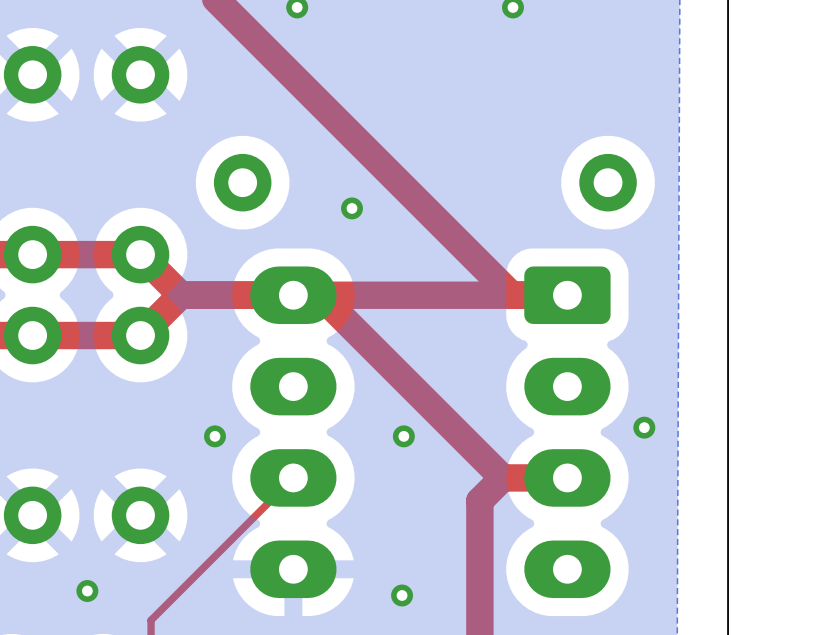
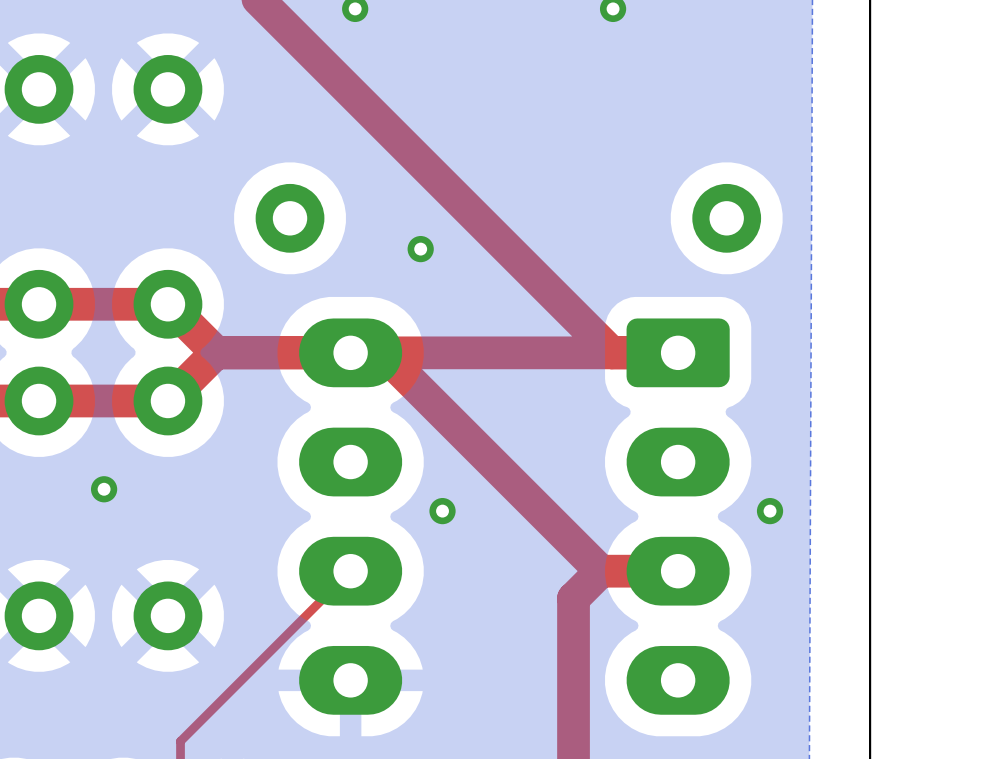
via: none -> (104, 489)
via: (214, 436) -> none
via position: (403, 436) -> (442, 511)
via: (87, 591) -> none
via: (402, 595) -> none

